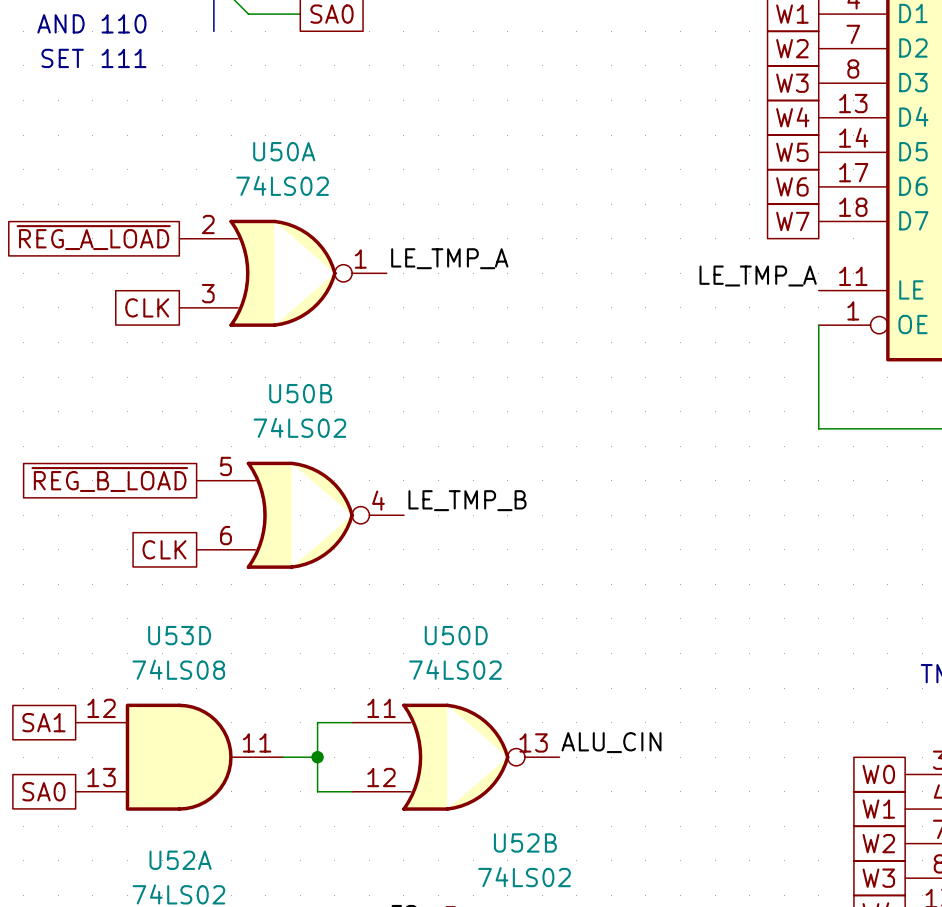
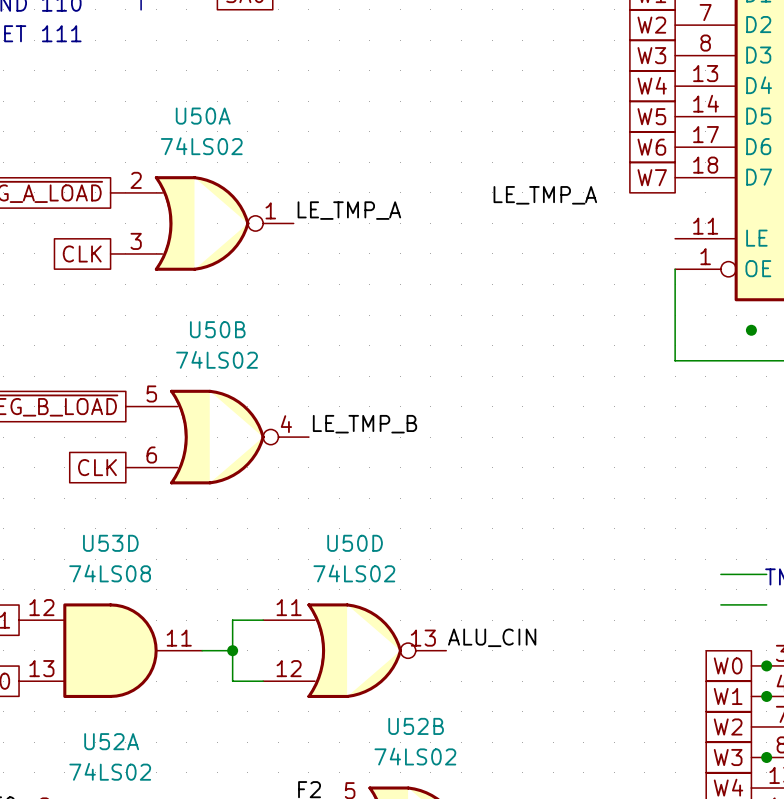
label position: LE_TMP_A (758, 276) -> LE_TMP_A (545, 195)
junction: none -> (751, 330)
wire: none -> (720, 574) (766, 574)
wire: none -> (720, 604) (766, 604)
junction: none -> (766, 665)
junction: none -> (766, 696)
junction: none -> (766, 757)

